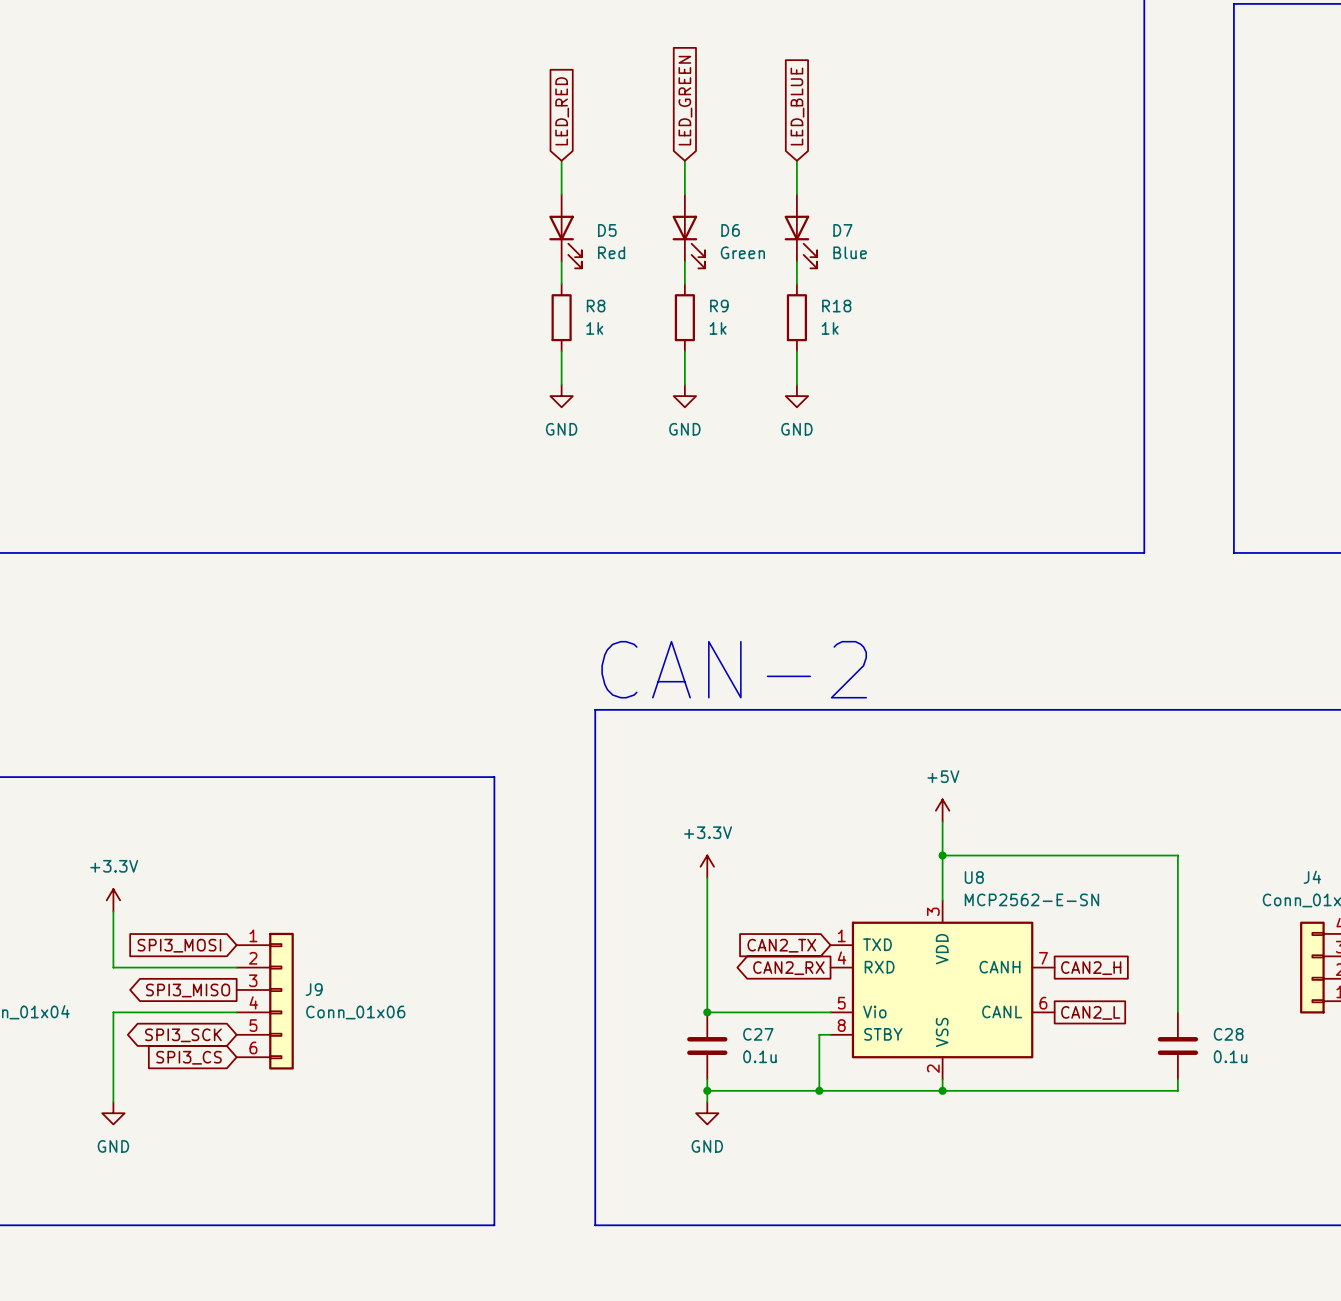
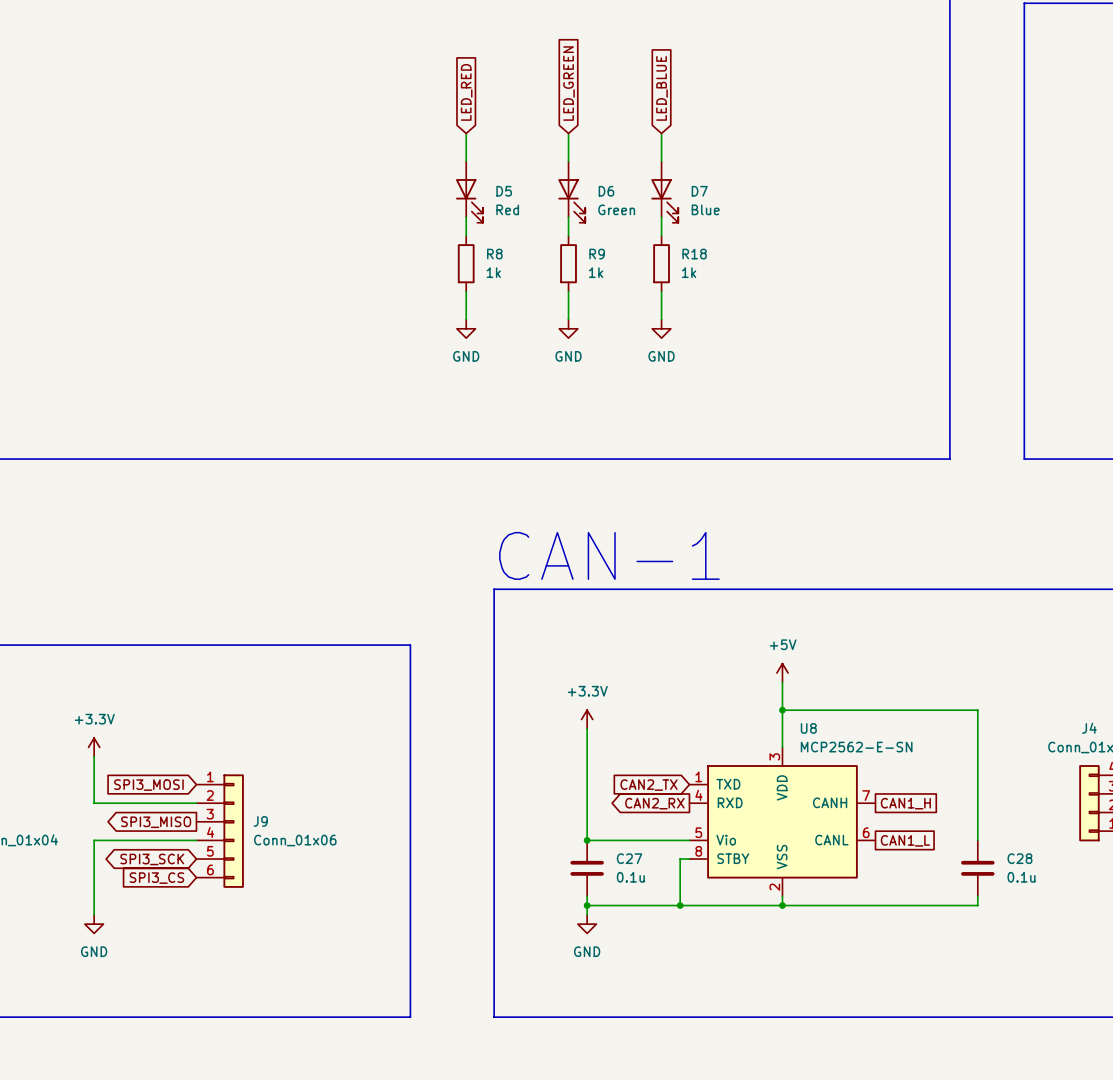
text: CAN-2 (734, 669) -> CAN-1 (609, 555)
global label: CAN2_H (1091, 968) -> CAN1_H (905, 803)
global label: CAN2_L (1090, 1012) -> CAN1_L (905, 840)

